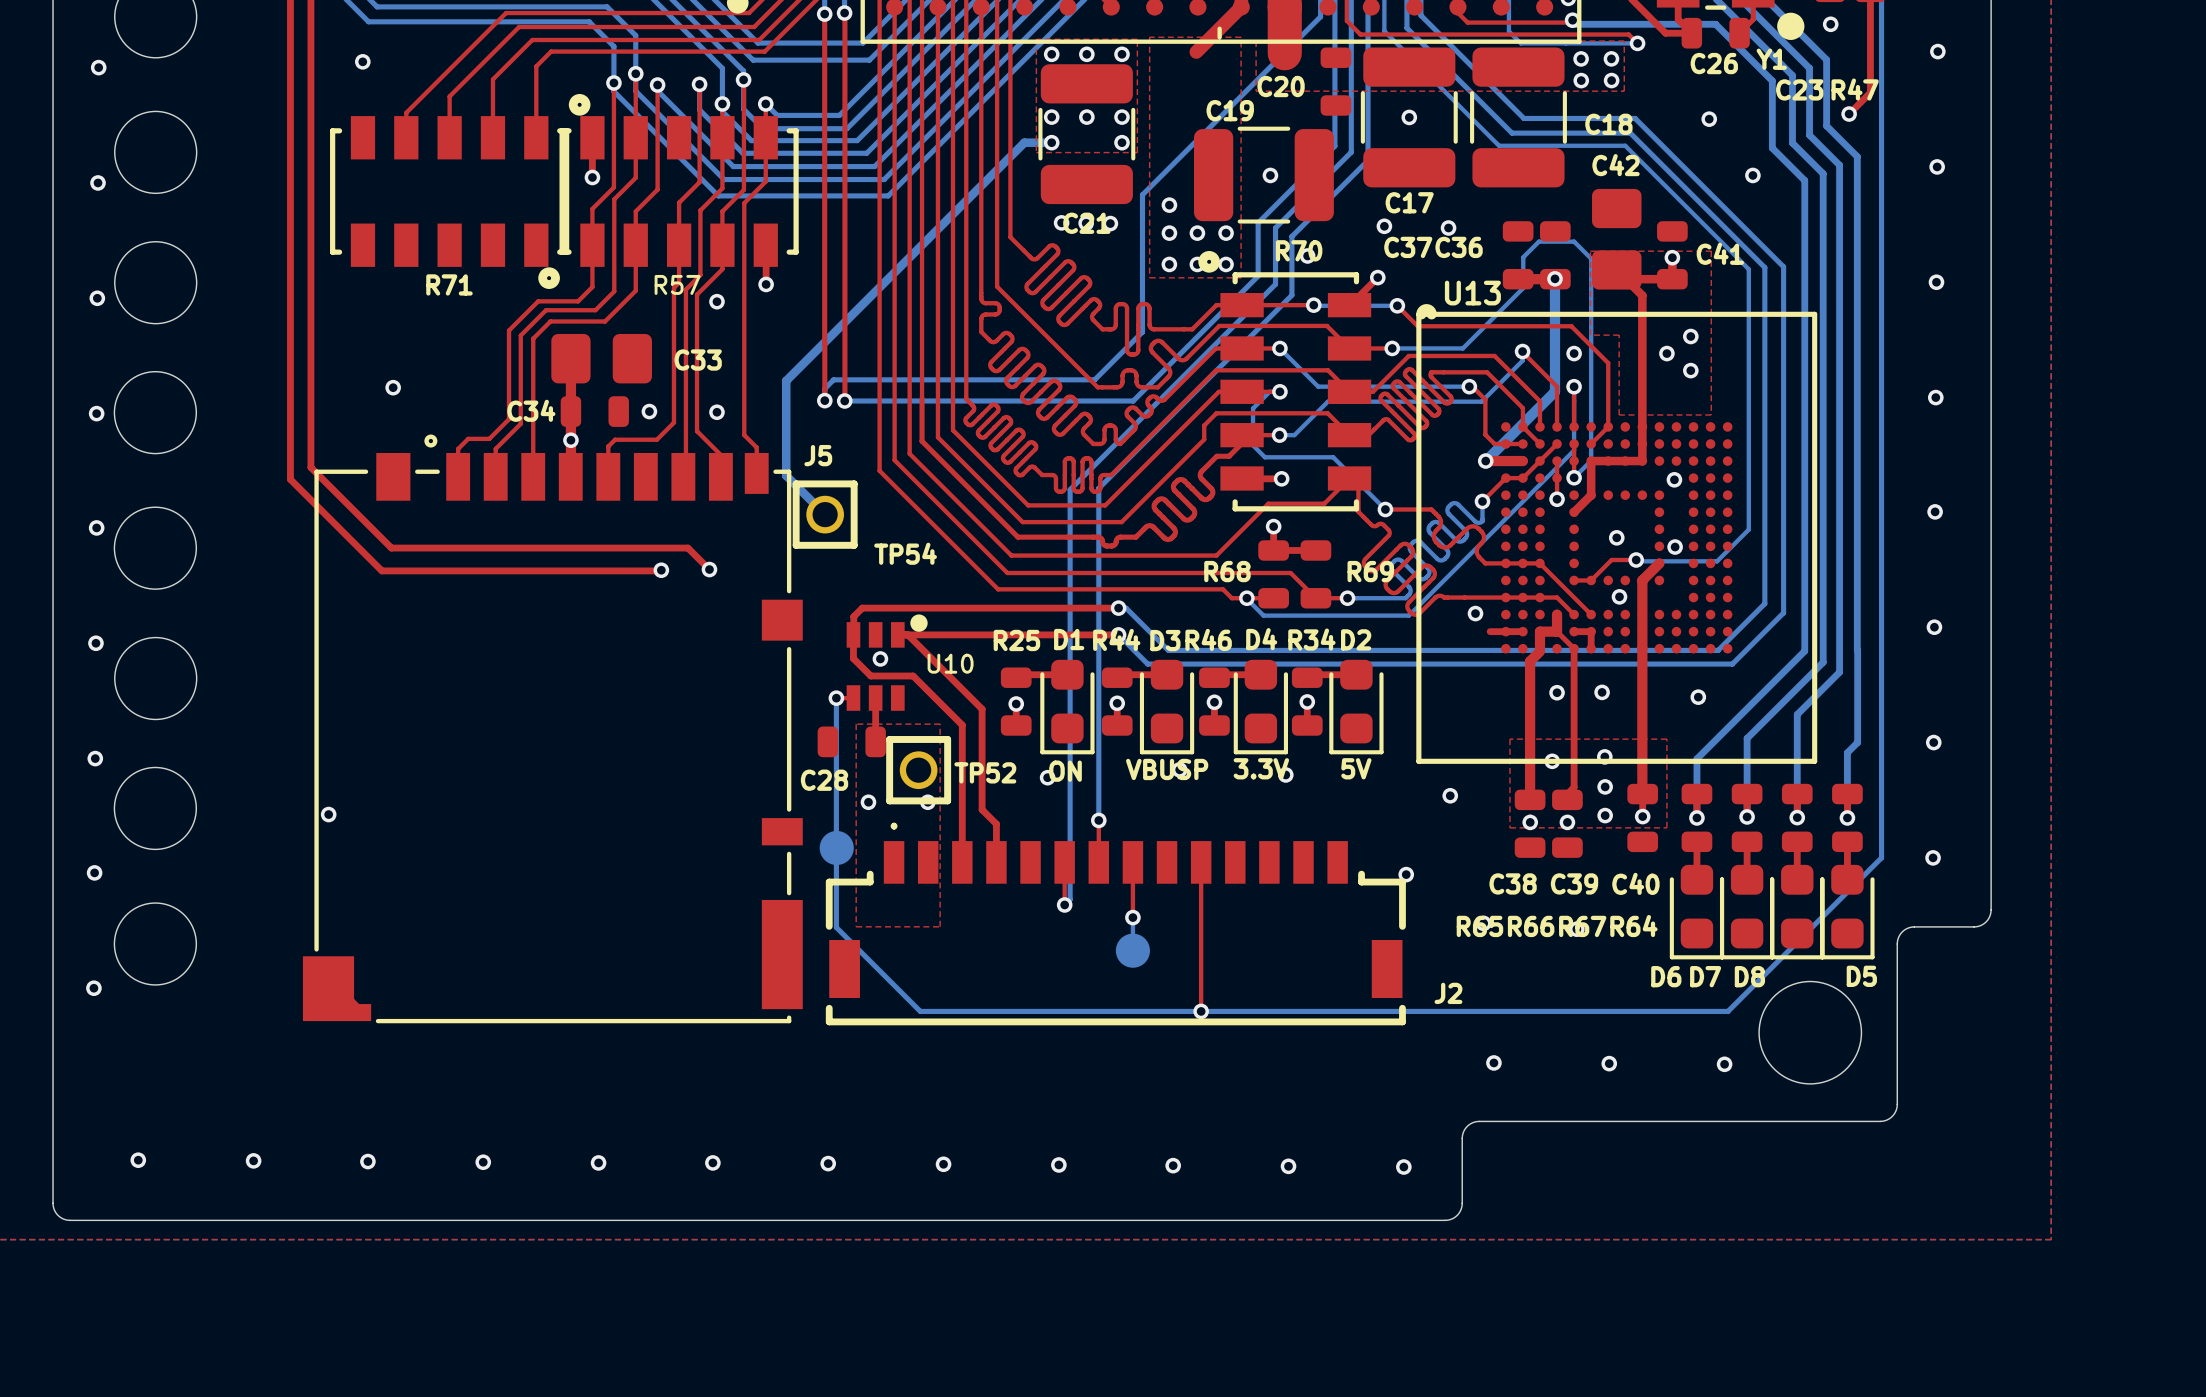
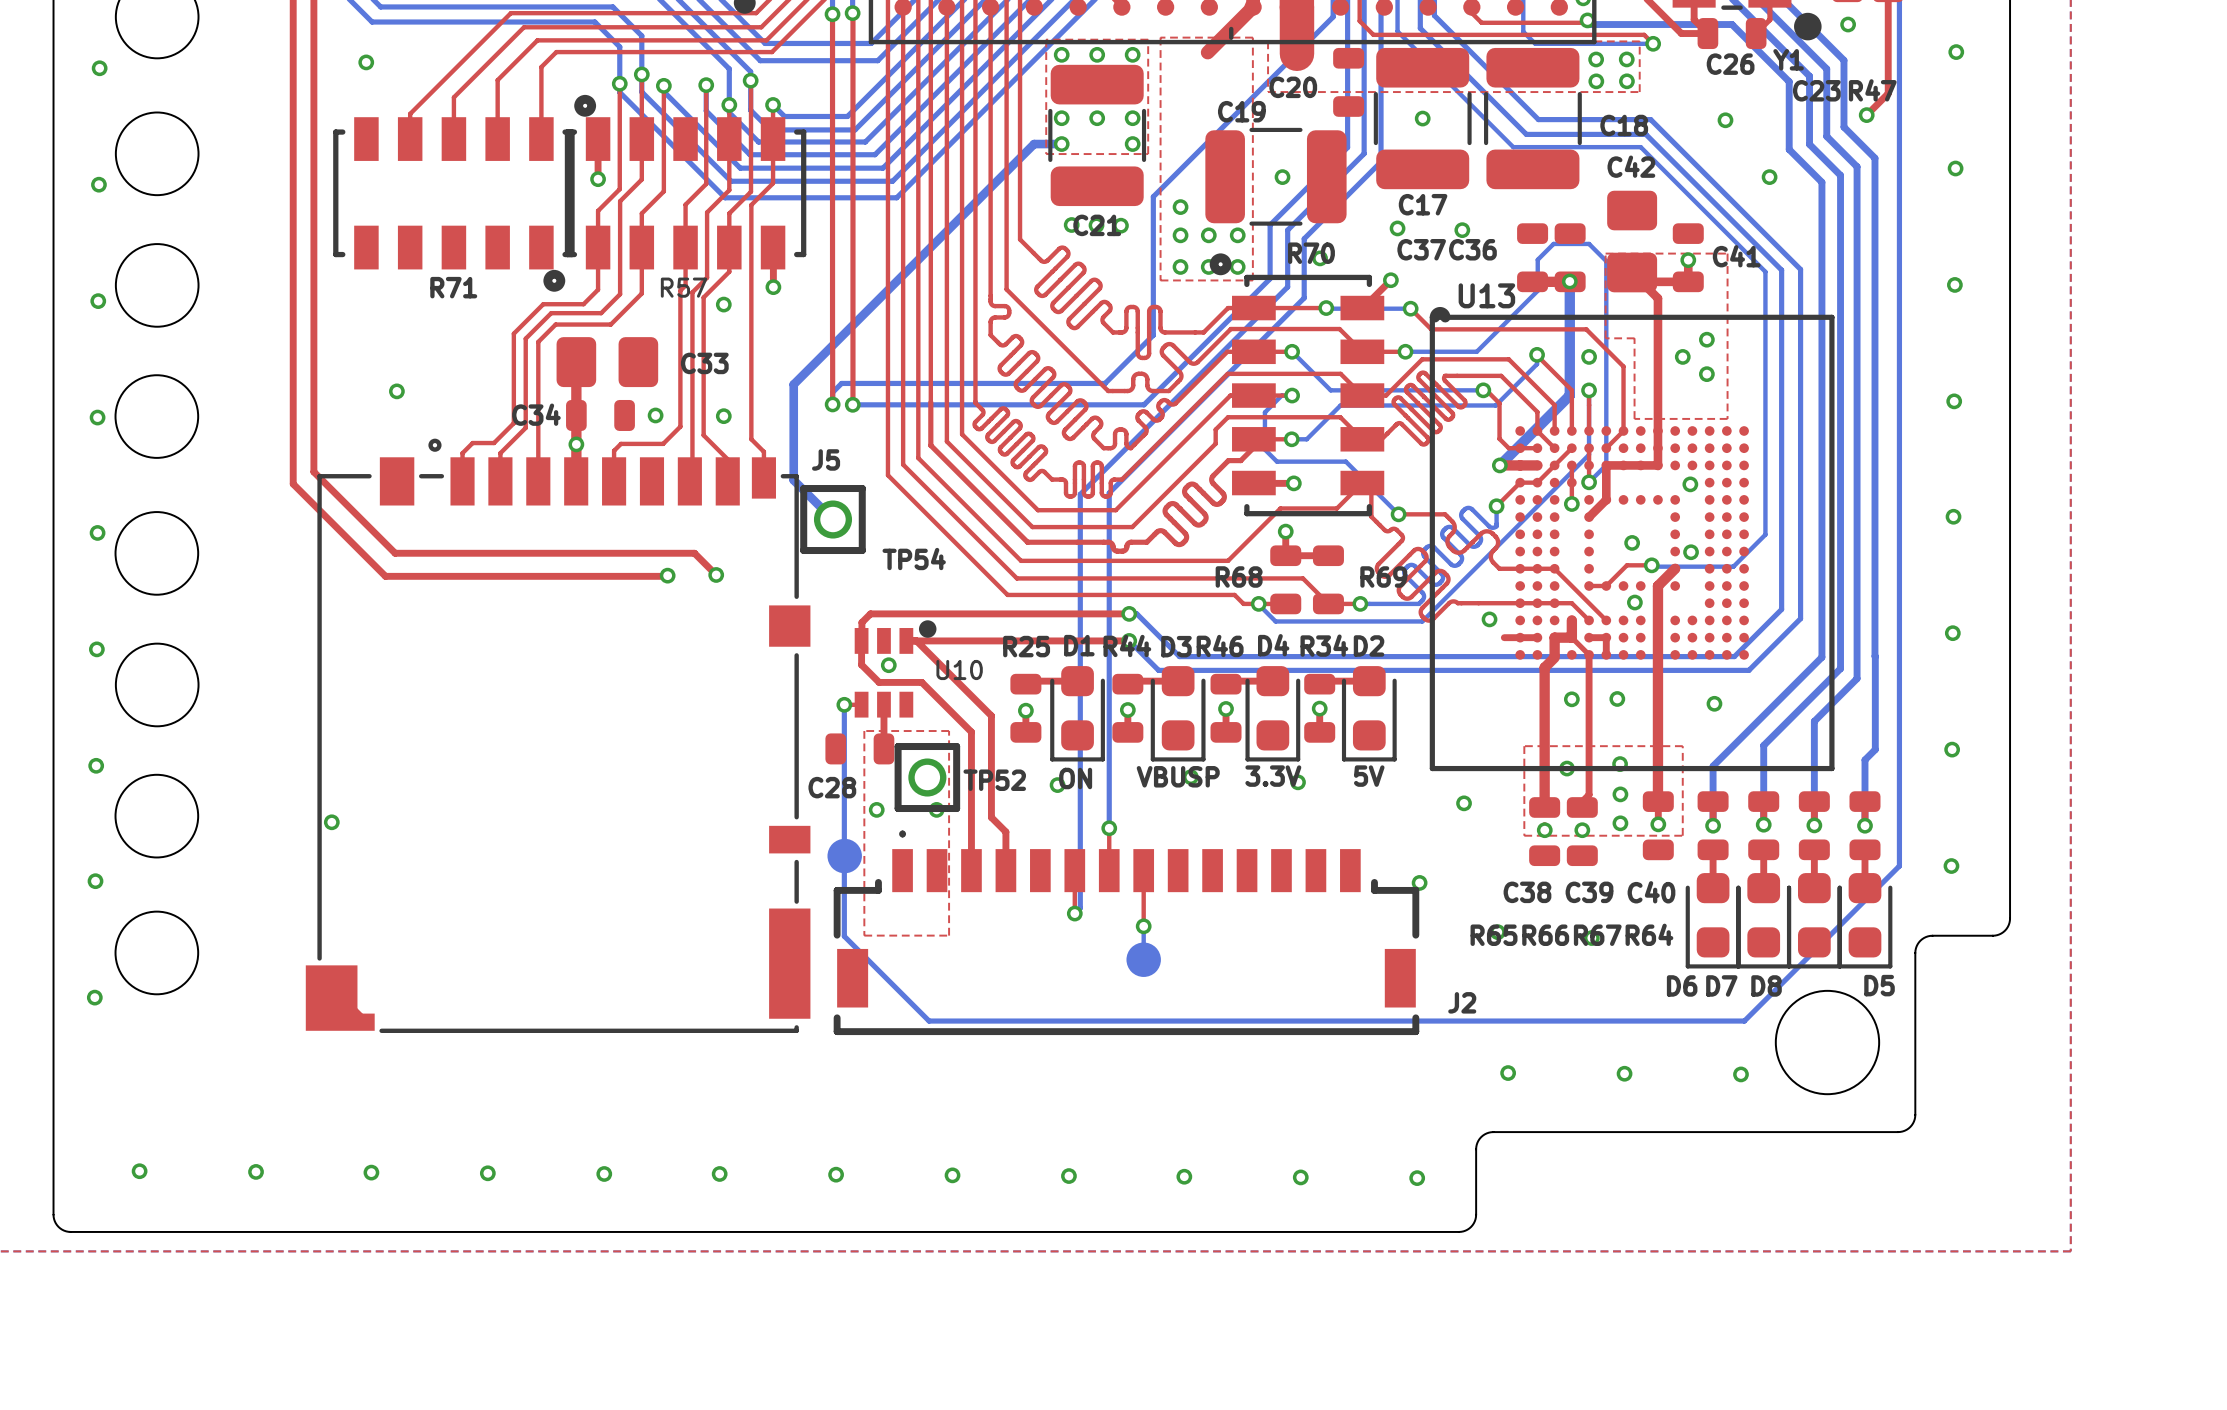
top track: (1201, 862) (1201, 1011) -> none
via: (1201, 1011) -> none

